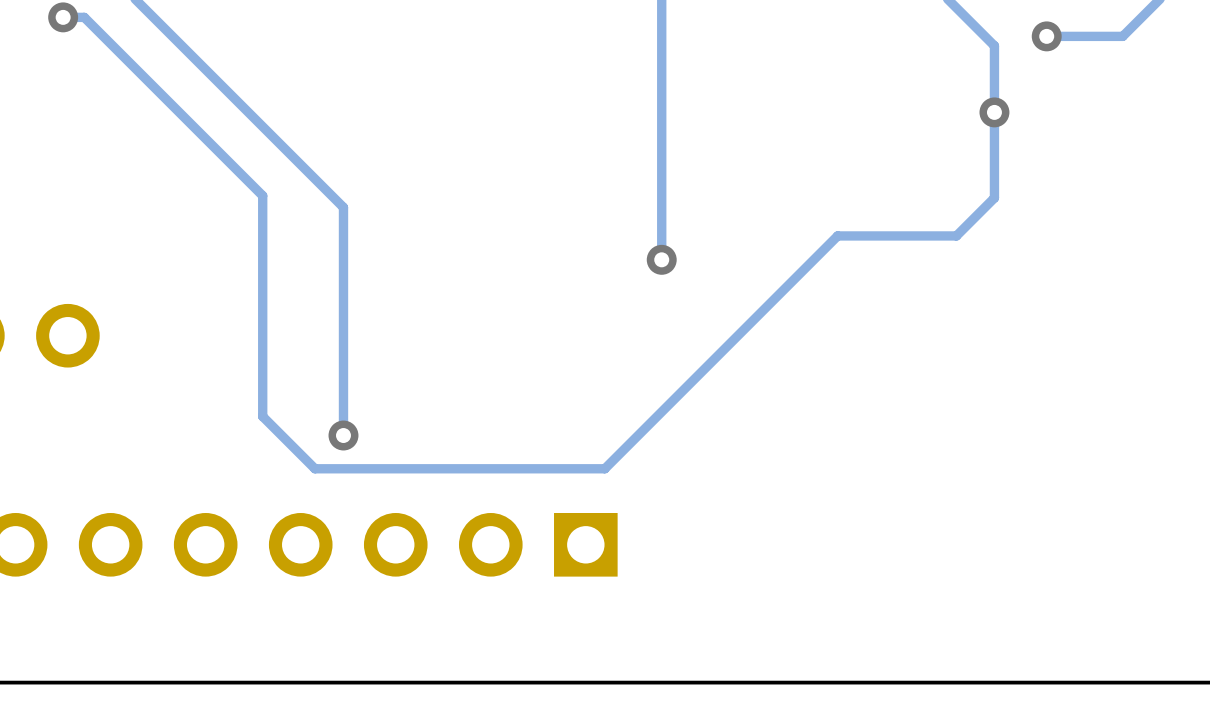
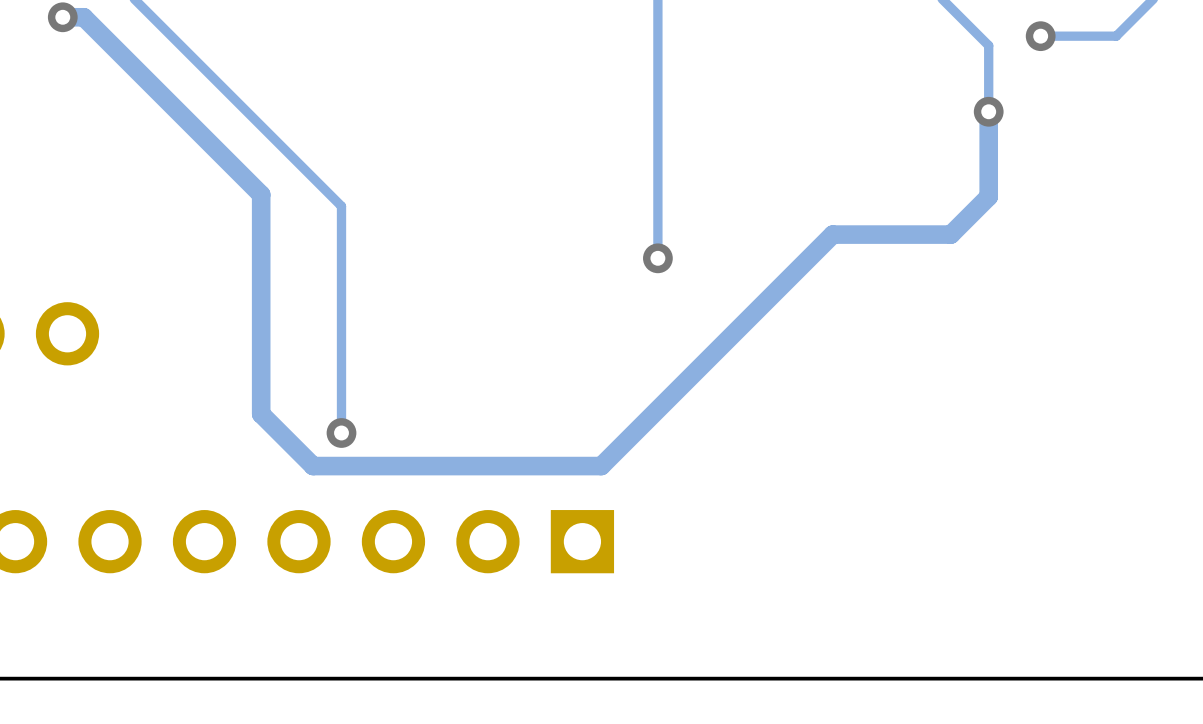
track width: thin (63, 17) (84, 17) (262, 195) (262, 416) (314, 468) (604, 468) (837, 235) (956, 235) (994, 197) (994, 112) -> thick (62, 17) (83, 17) (261, 194) (261, 414) (313, 466) (601, 466) (832, 234) (950, 234) (988, 196) (988, 111)

